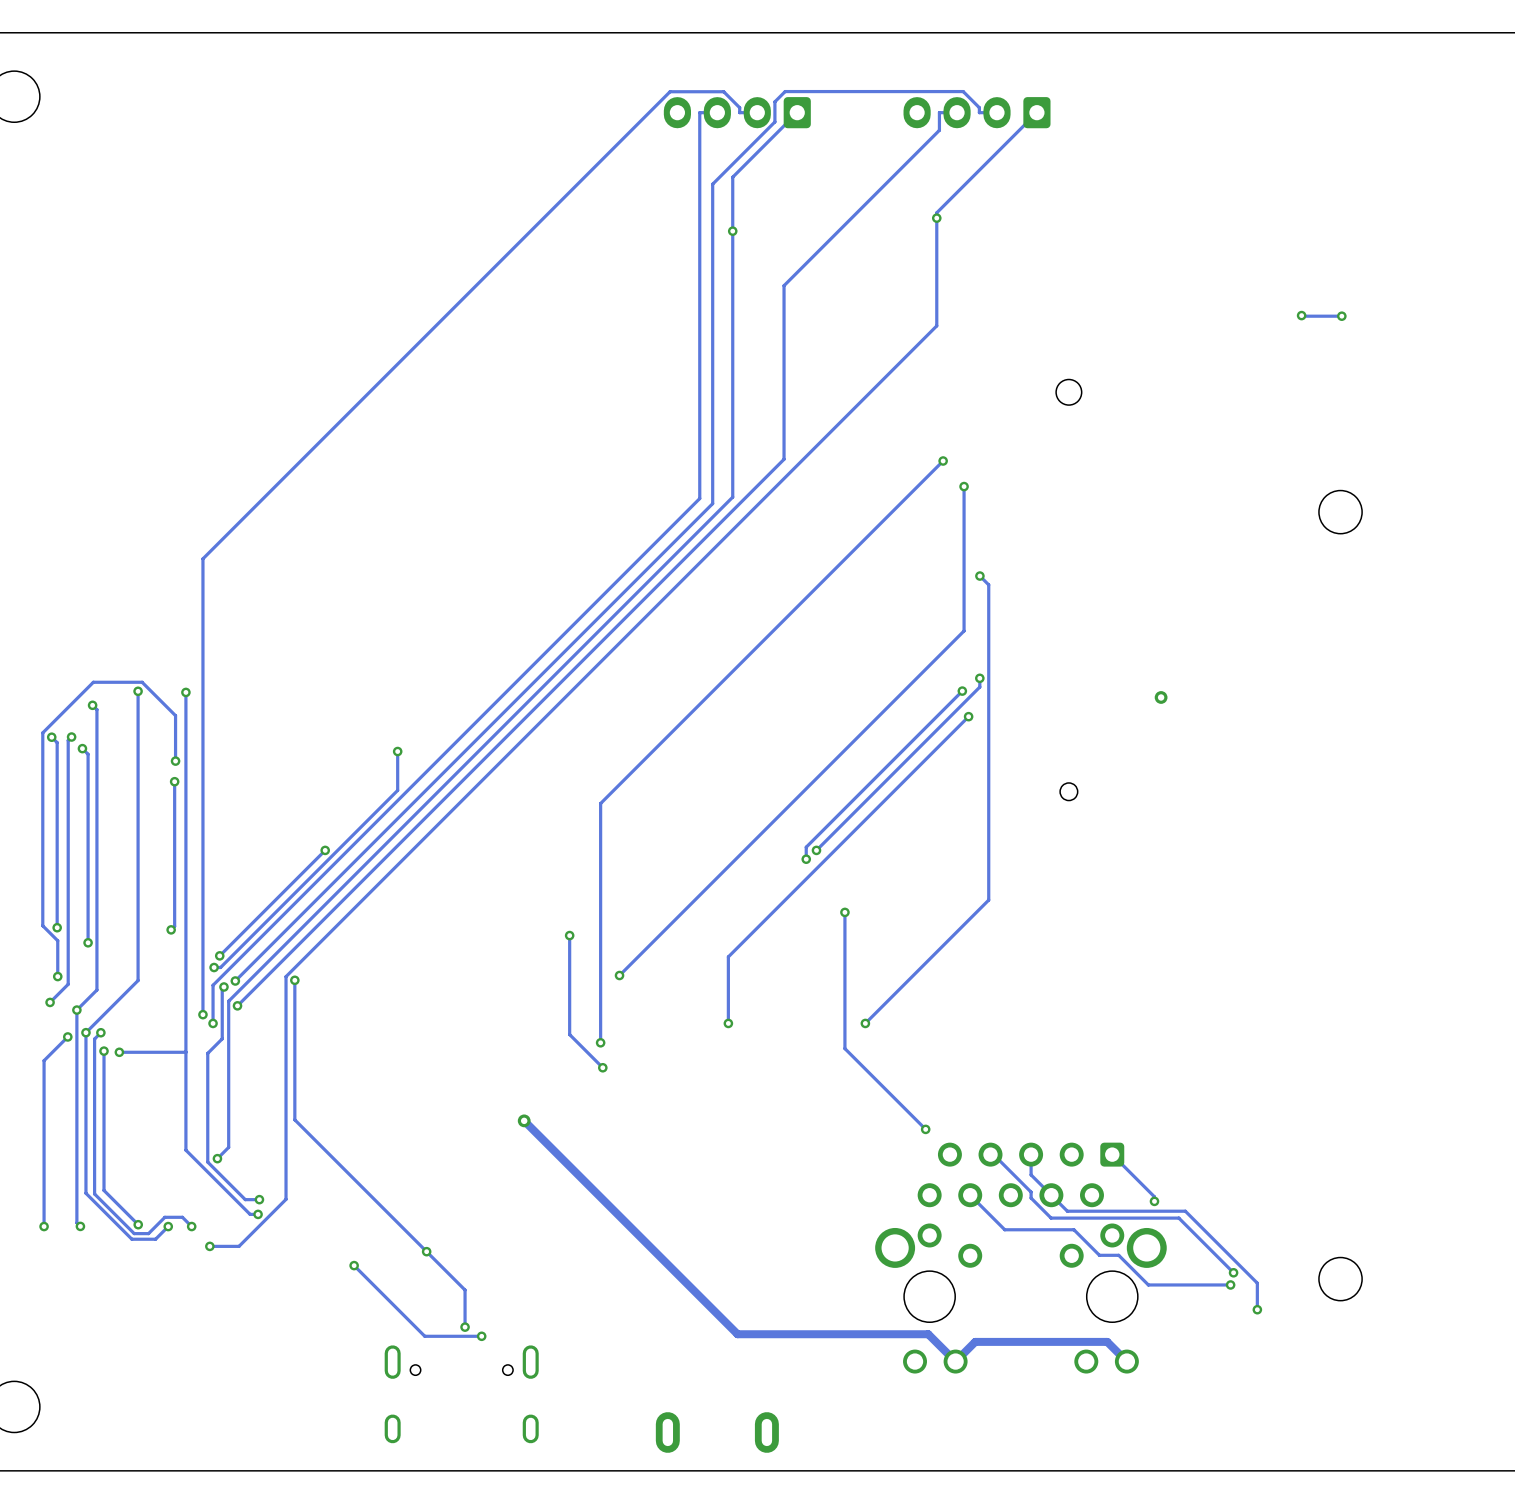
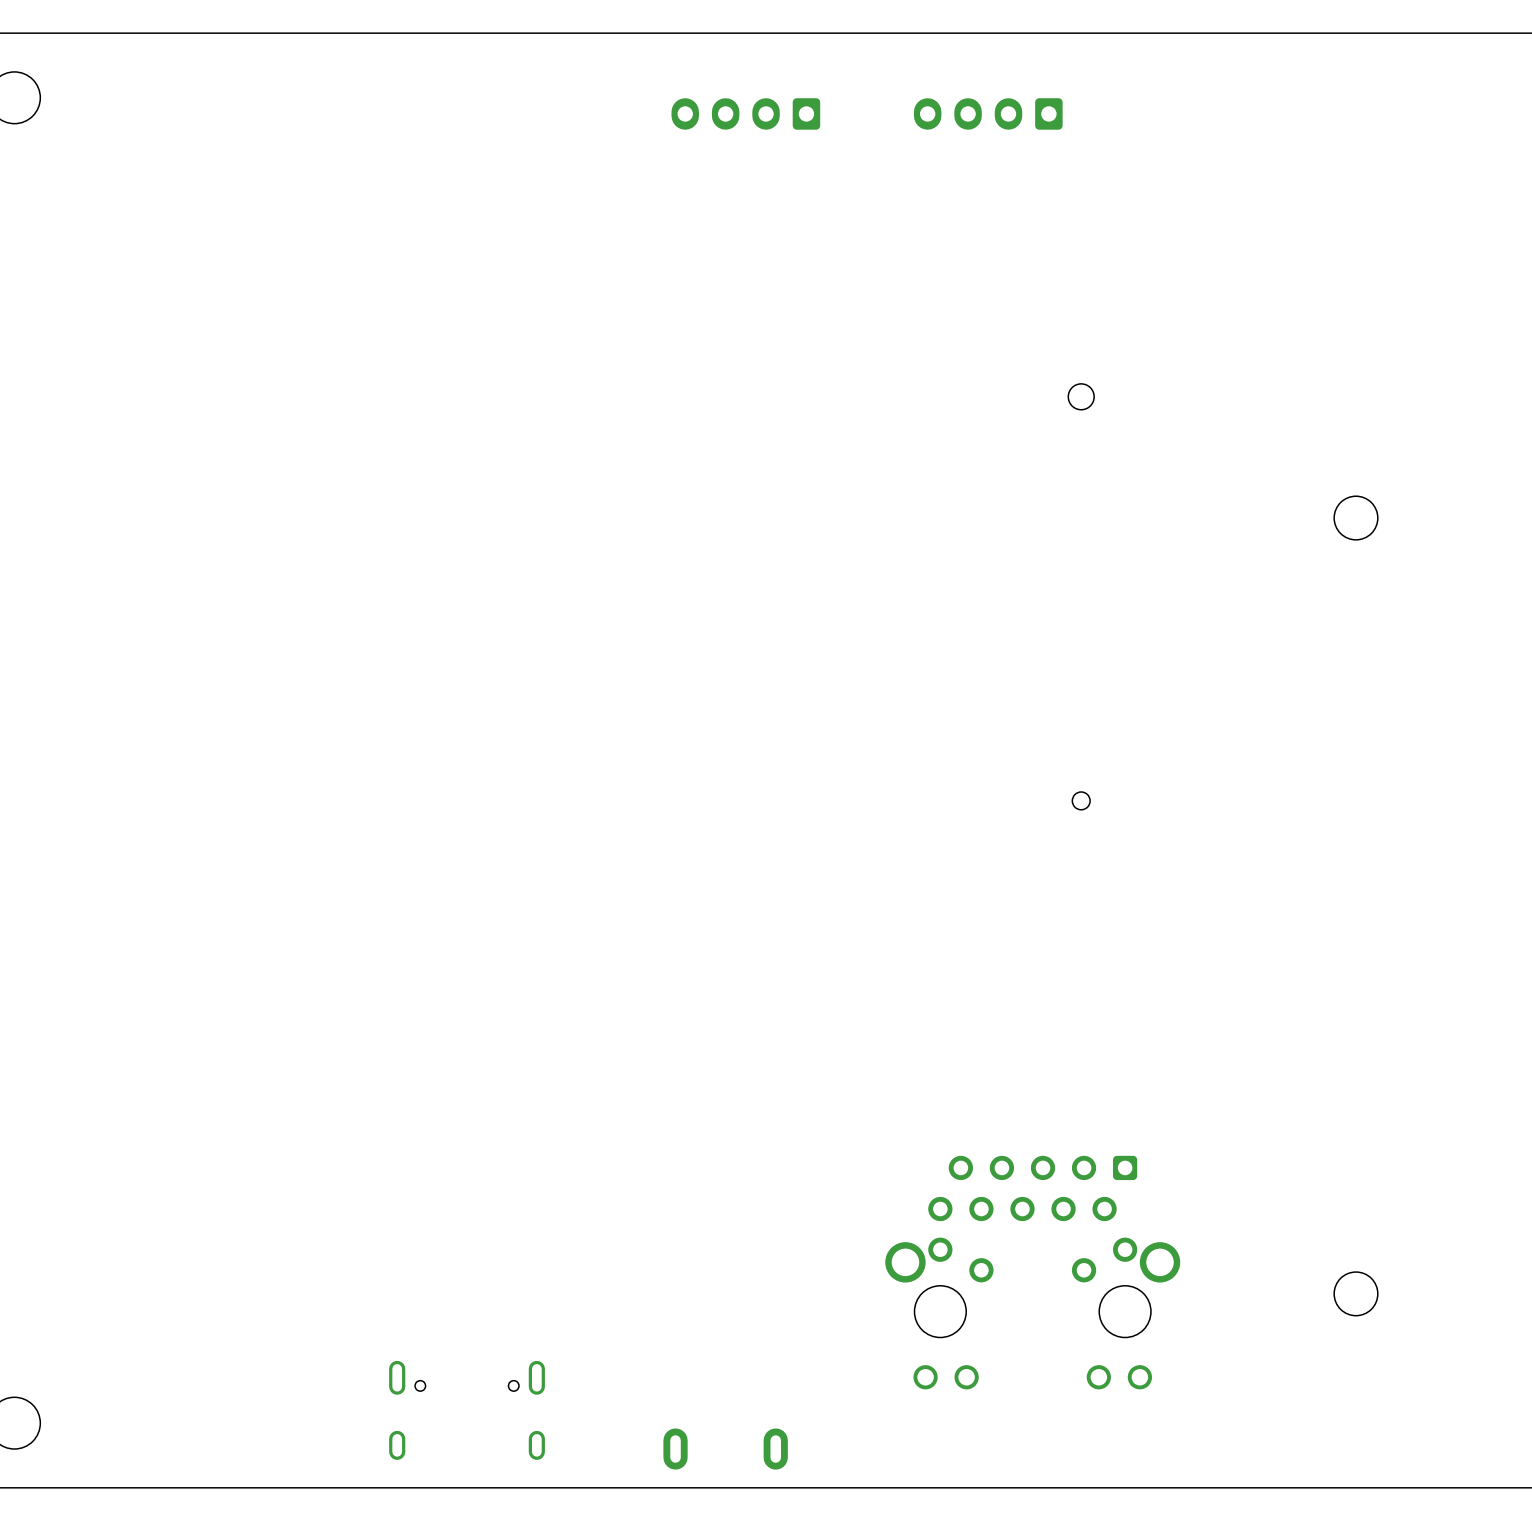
track: (717, 112) (699, 112) (699, 498) (213, 985) (213, 1023) -> none
track: (757, 112) (739, 112) (739, 107) (723, 91) (670, 91) (202, 558) (202, 1014) -> none
track: (797, 112) (732, 177) (732, 497) (228, 1001) (228, 1147) (217, 1158) -> none
track: (957, 112) (939, 112) (939, 130) (784, 285) (784, 459) (237, 1005) -> none
track: (996, 112) (979, 112) (979, 107) (963, 91) (785, 91) (774, 101) (774, 121) (712, 184) (712, 503) (235, 981) -> none
track: (1036, 112) (936, 212) (936, 325) (286, 976) (286, 1199) (239, 1246) (209, 1246) -> none
via: (936, 218) -> none
via: (732, 231) -> none
track: (1301, 315) (1341, 316) -> none
via: (1301, 315) -> none
via: (1341, 316) -> none
track: (943, 461) (600, 803) (600, 1042) -> none
via: (943, 461) -> none
track: (964, 486) (964, 630) (619, 975) -> none
via: (964, 486) -> none
track: (979, 576) (988, 584) (988, 900) (865, 1023) -> none
via: (979, 576) -> none
track: (979, 678) (979, 687) (816, 850) -> none
via: (979, 678) -> none
track: (138, 691) (138, 980) (85, 1032) (85, 1193) (131, 1239) (155, 1239) (168, 1226) -> none
via: (138, 691) -> none
track: (962, 691) (806, 847) (806, 859) -> none
via: (962, 691) -> none
track: (185, 692) (185, 1150) (250, 1214) (258, 1214) -> none
via: (185, 692) -> none
via: (1161, 697) -> none
track: (92, 705) (96, 709) (96, 990) (76, 1010) (76, 1222) (80, 1226) -> none
via: (92, 705) -> none
track: (968, 716) (728, 956) (728, 1023) -> none
via: (968, 716) -> none
track: (51, 737) (57, 742) (57, 927) -> none
via: (51, 737) -> none
track: (71, 737) (68, 740) (68, 984) (50, 1002) -> none
via: (71, 737) -> none
track: (82, 748) (88, 754) (88, 942) -> none
via: (82, 748) -> none
track: (397, 751) (397, 790) (220, 967) (214, 967) -> none
via: (397, 751) -> none
track: (175, 761) (175, 715) (142, 682) (93, 682) (42, 732) (42, 925) (57, 940) (57, 976) -> none
via: (175, 761) -> none
track: (174, 781) (174, 926) (171, 929) -> none
via: (174, 781) -> none
track: (325, 850) (219, 955) -> none
via: (325, 850) -> none
via: (816, 850) -> none
via: (806, 859) -> none
track: (844, 912) (844, 1048) (925, 1129) -> none
via: (844, 912) -> none
via: (57, 927) -> none
via: (171, 929) -> none
track: (569, 935) (569, 1034) (602, 1067) -> none
via: (569, 935) -> none
via: (88, 942) -> none
via: (219, 955) -> none
via: (214, 967) -> none
via: (619, 975) -> none
via: (57, 976) -> none
track: (294, 980) (294, 1119) (465, 1290) (465, 1327) -> none
via: (294, 980) -> none
via: (235, 981) -> none
track: (223, 986) (222, 988) (222, 1038) (207, 1053) (207, 1162) (245, 1199) (259, 1199) -> none
via: (223, 986) -> none
via: (50, 1002) -> none
via: (237, 1005) -> none
via: (76, 1010) -> none
via: (202, 1014) -> none
via: (213, 1023) -> none
via: (728, 1023) -> none
via: (865, 1023) -> none
via: (85, 1032) -> none
track: (100, 1032) (94, 1039) (94, 1193) (134, 1233) (148, 1233) (164, 1217) (182, 1217) (191, 1226) -> none
via: (100, 1032) -> none
track: (67, 1036) (44, 1060) (44, 1226) -> none
via: (67, 1036) -> none
via: (600, 1042) -> none
track: (104, 1051) (104, 1190) (138, 1224) -> none
via: (104, 1051) -> none
via: (119, 1052) -> none
track: (185, 1052) (119, 1052) -> none
via: (602, 1067) -> none
track: (524, 1120) (737, 1334) (928, 1334) (955, 1361) (975, 1341) (1107, 1341) (1126, 1361) -> none
via: (524, 1120) -> none
via: (925, 1129) -> none
track: (990, 1154) (993, 1154) (1031, 1192) (1031, 1198) (1051, 1218) (1178, 1218) (1233, 1272) -> none
track: (1031, 1154) (1031, 1174) (1067, 1211) (1185, 1211) (1257, 1283) (1257, 1309) -> none
track: (1112, 1154) (1154, 1196) (1154, 1201) -> none
via: (217, 1158) -> none
track: (970, 1195) (1004, 1229) (1073, 1229) (1099, 1255) (1118, 1255) (1148, 1284) (1230, 1284) -> none
via: (259, 1199) -> none
via: (1154, 1201) -> none
via: (258, 1214) -> none
via: (138, 1224) -> none
via: (44, 1226) -> none
via: (80, 1226) -> none
via: (168, 1226) -> none
via: (191, 1226) -> none
via: (209, 1246) -> none
via: (426, 1251) -> none
track: (354, 1265) (424, 1336) (481, 1336) -> none
via: (354, 1265) -> none
via: (1233, 1272) -> none
via: (1230, 1284) -> none
via: (1257, 1309) -> none
via: (465, 1327) -> none
via: (481, 1336) -> none

